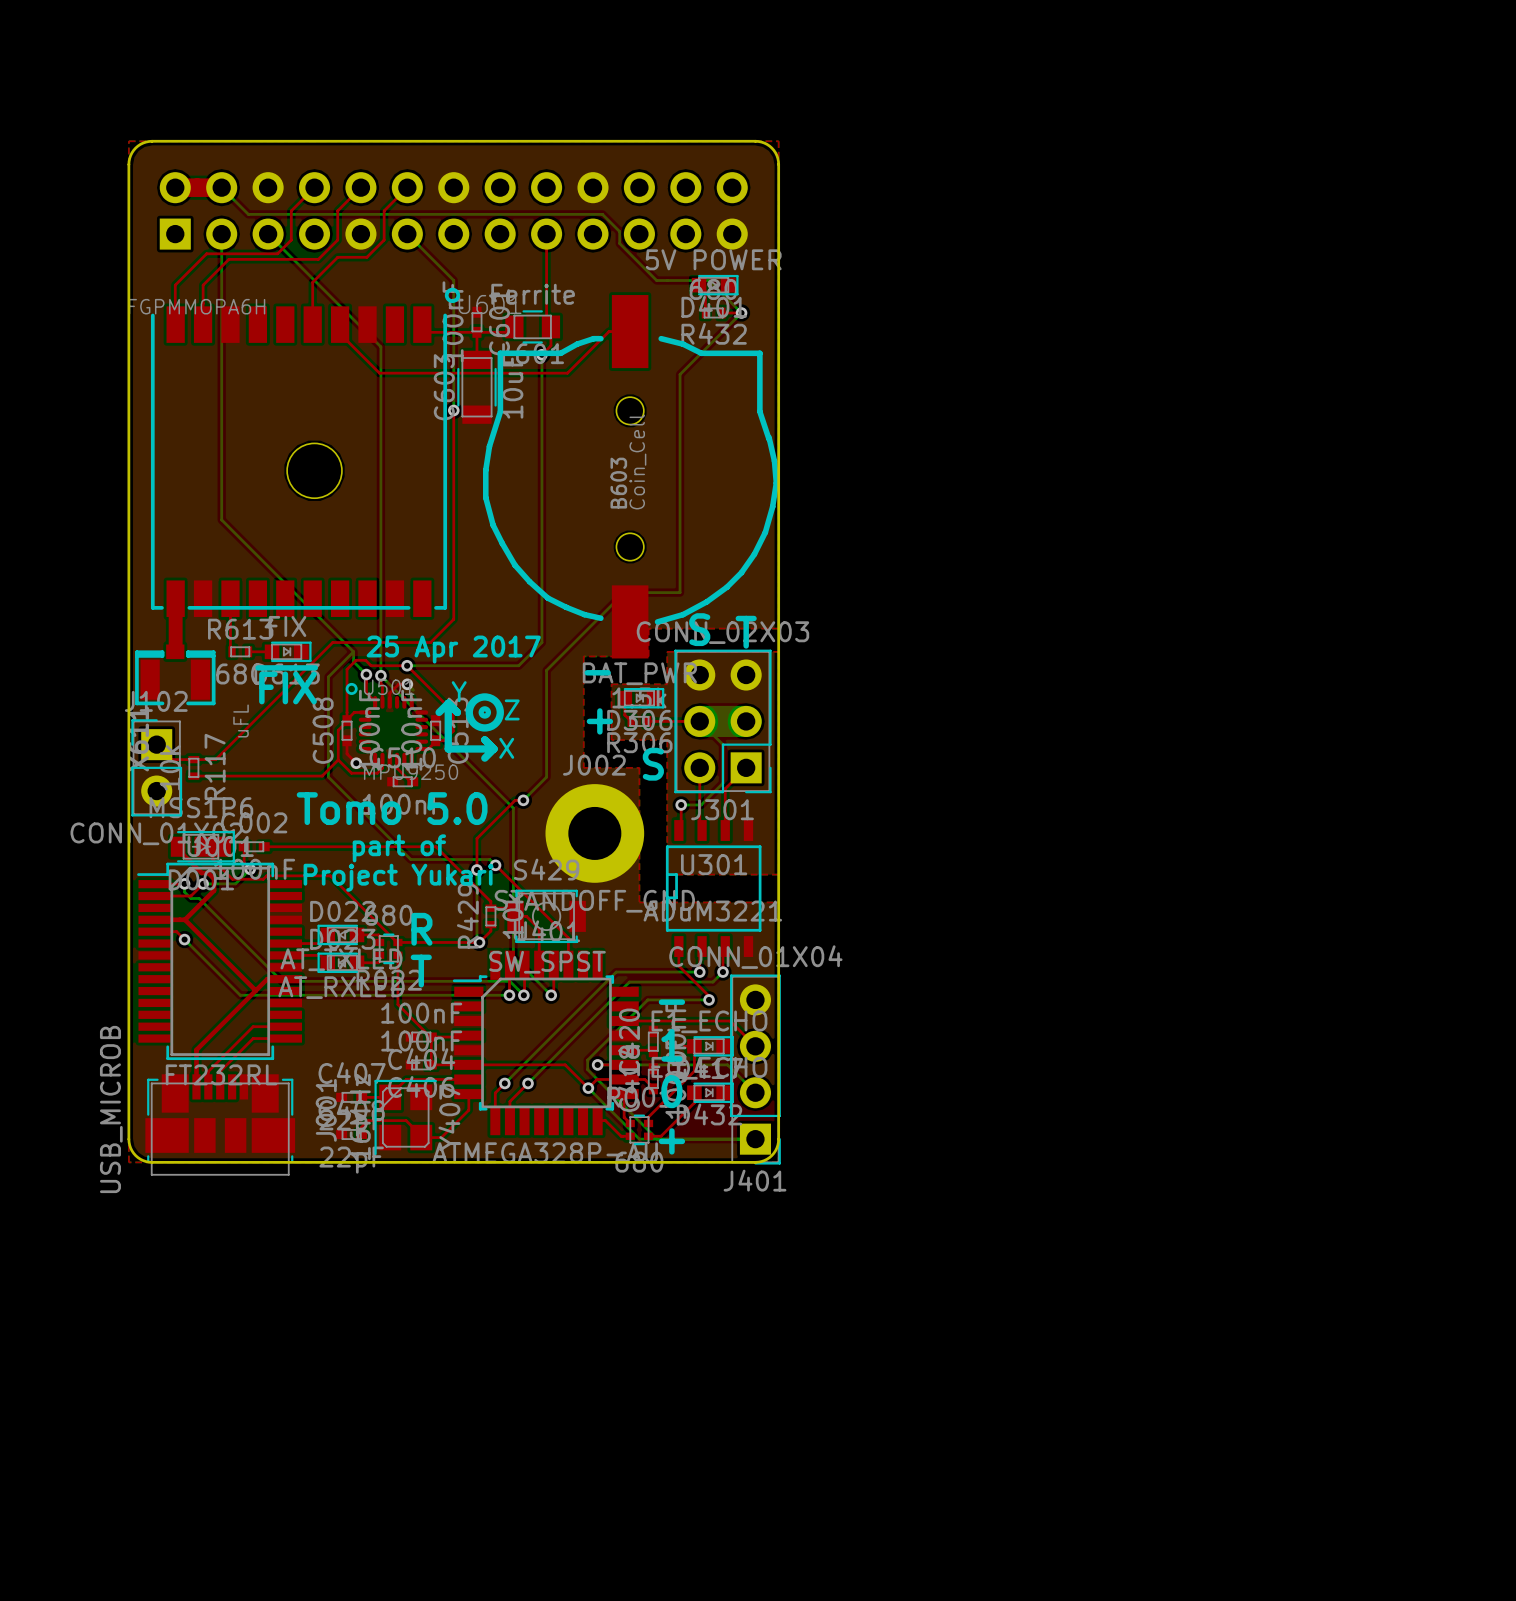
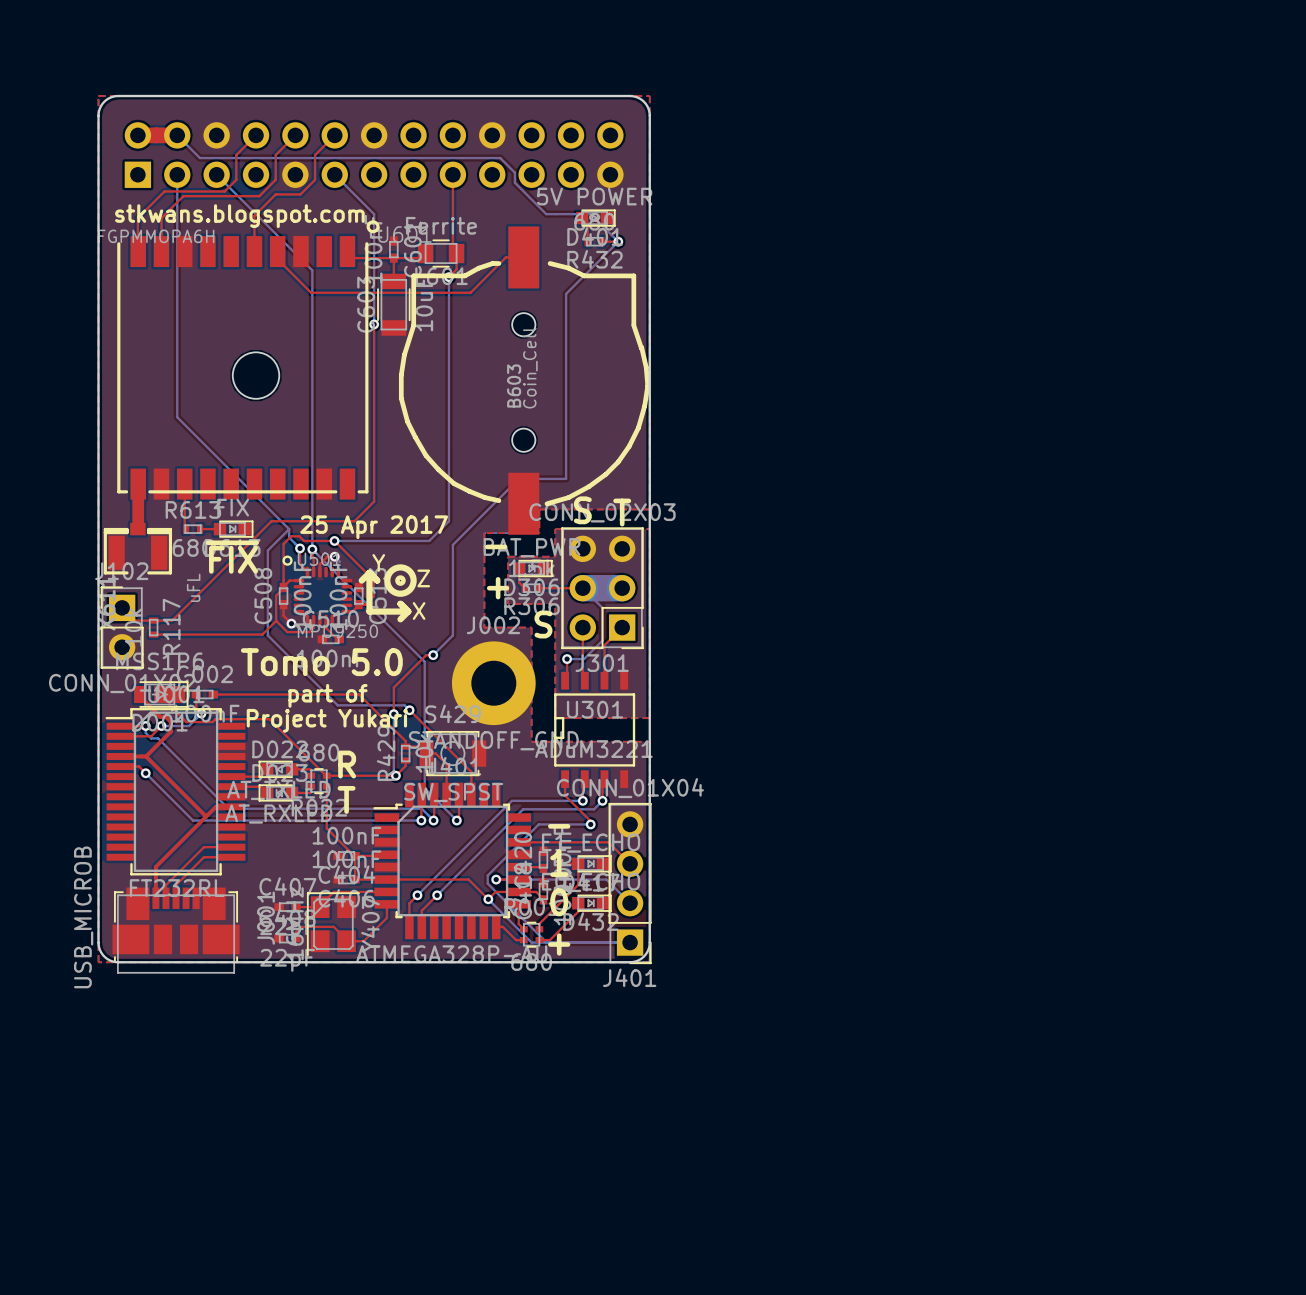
text: none -> stkwans.blogspot.com (239, 216)

